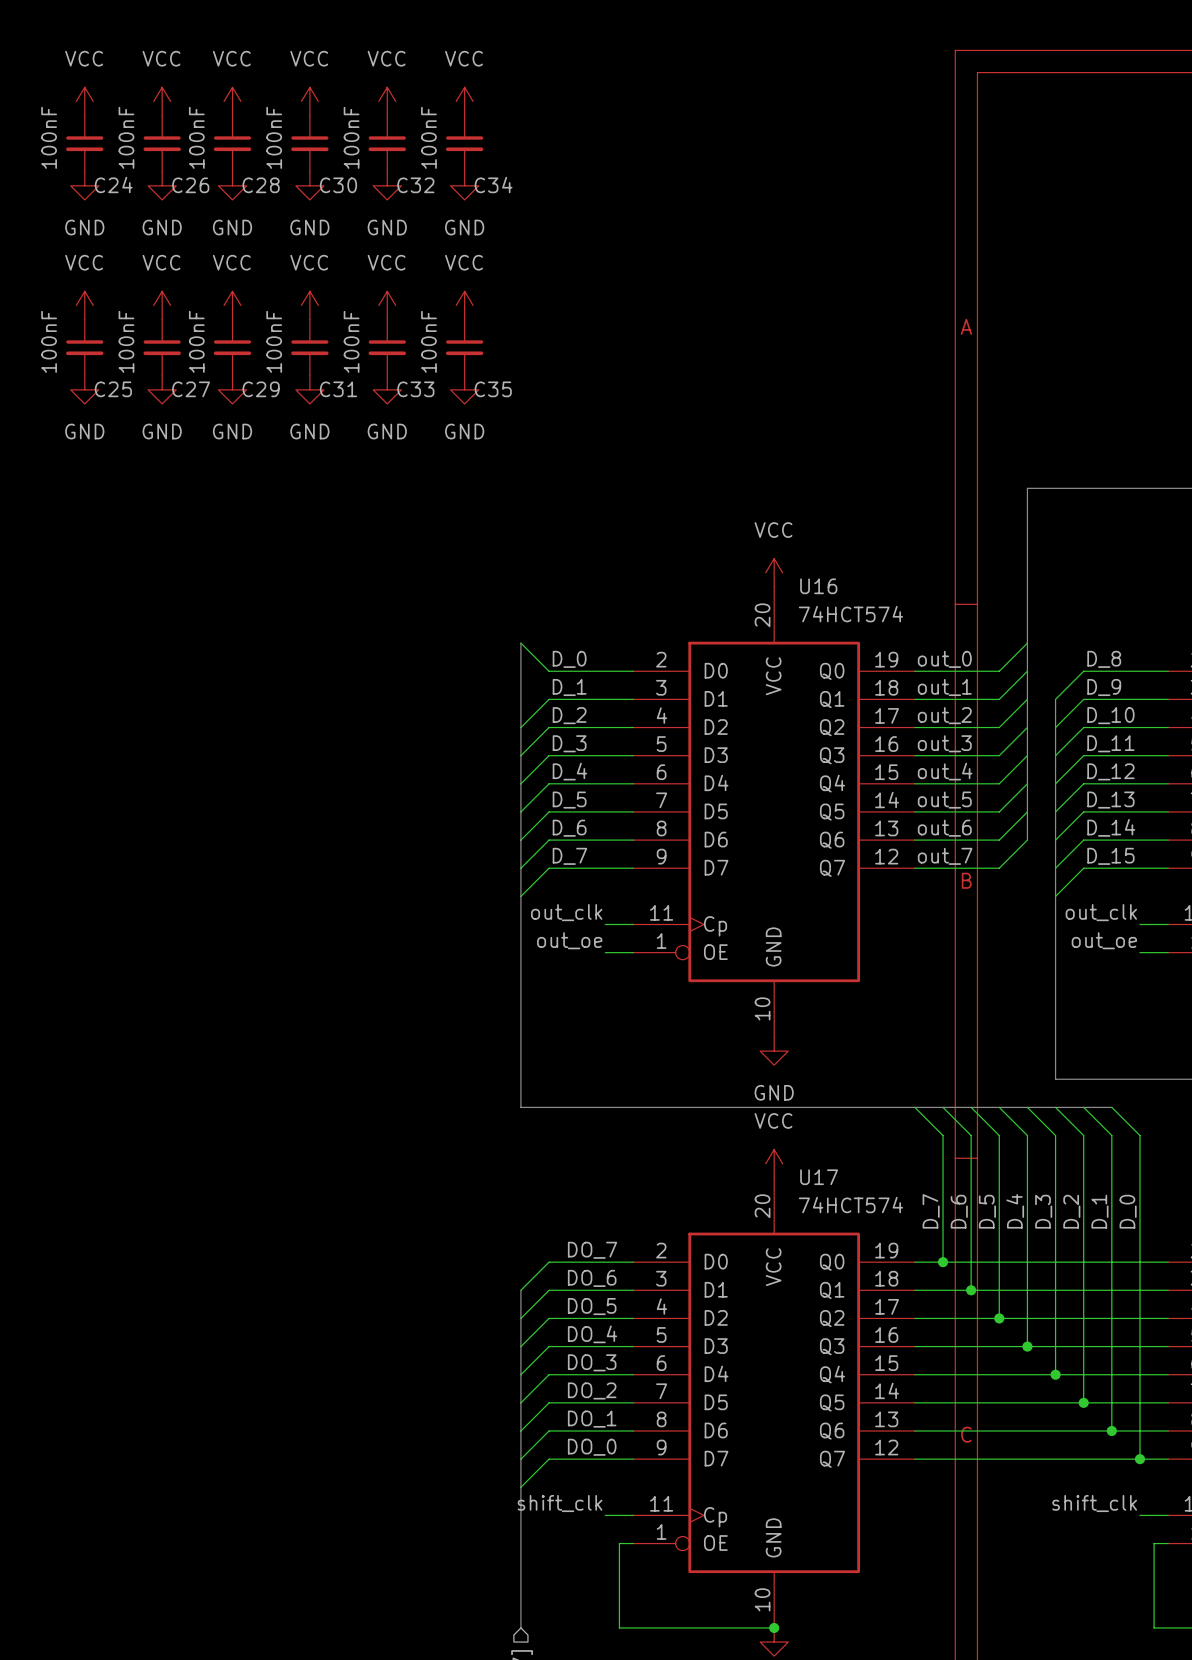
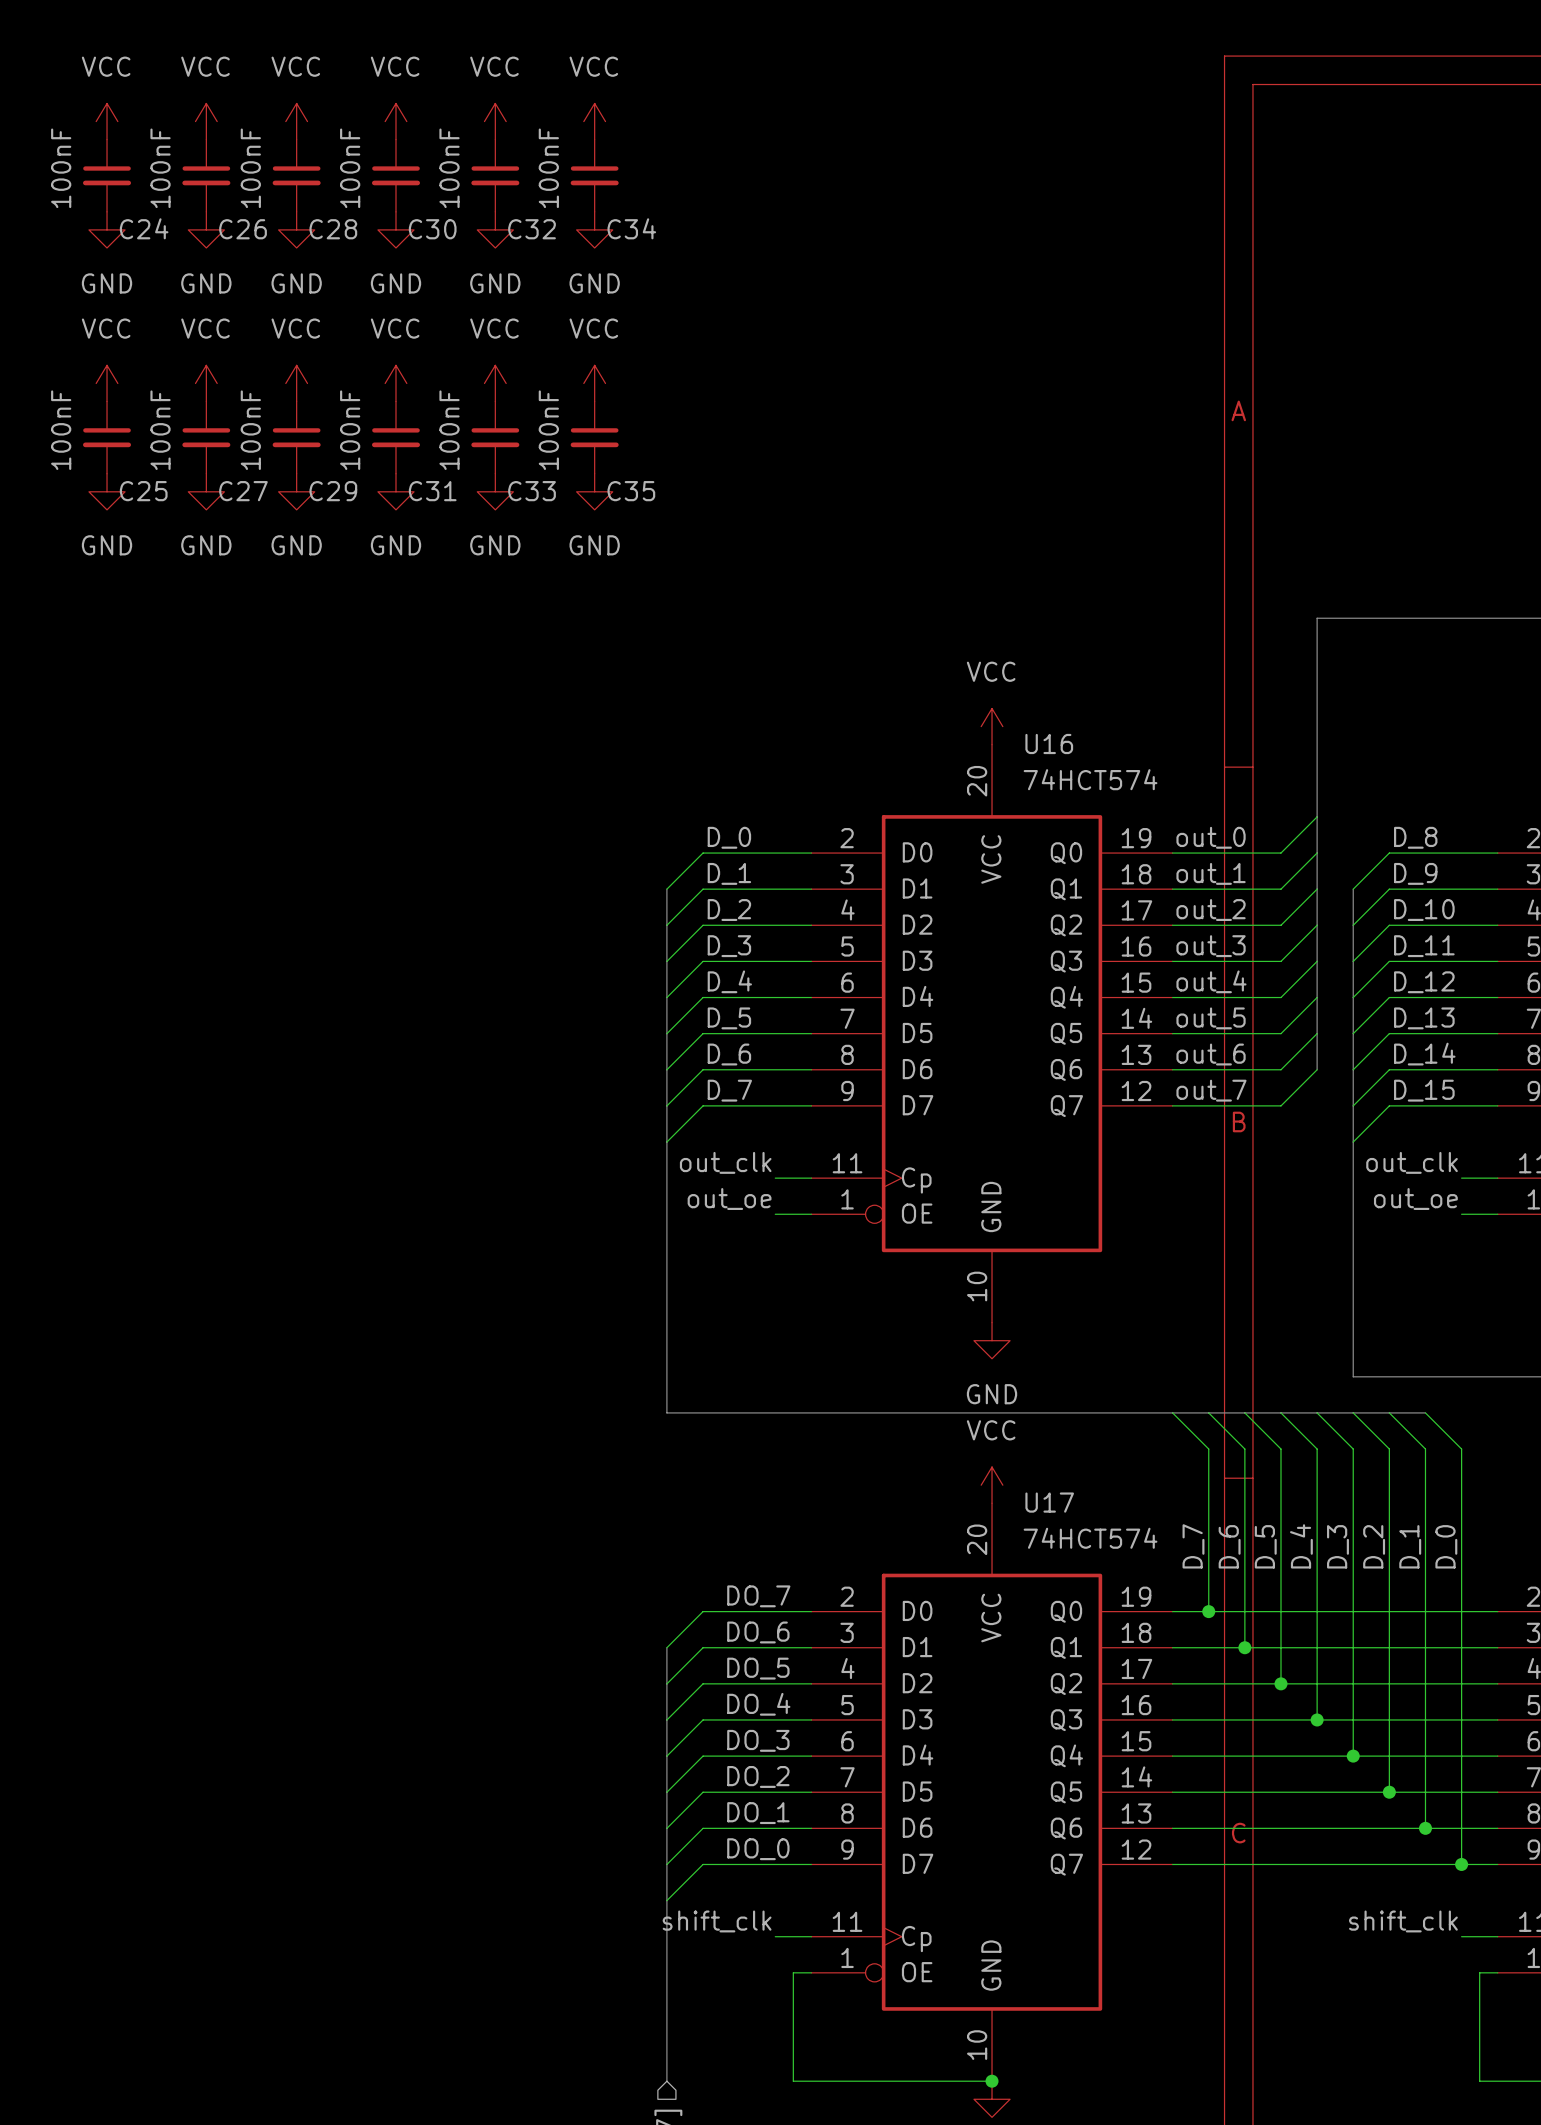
wire: (520, 643) (549, 671) -> (666, 889) (703, 853)
bus: (520, 643) (520, 699) -> none

